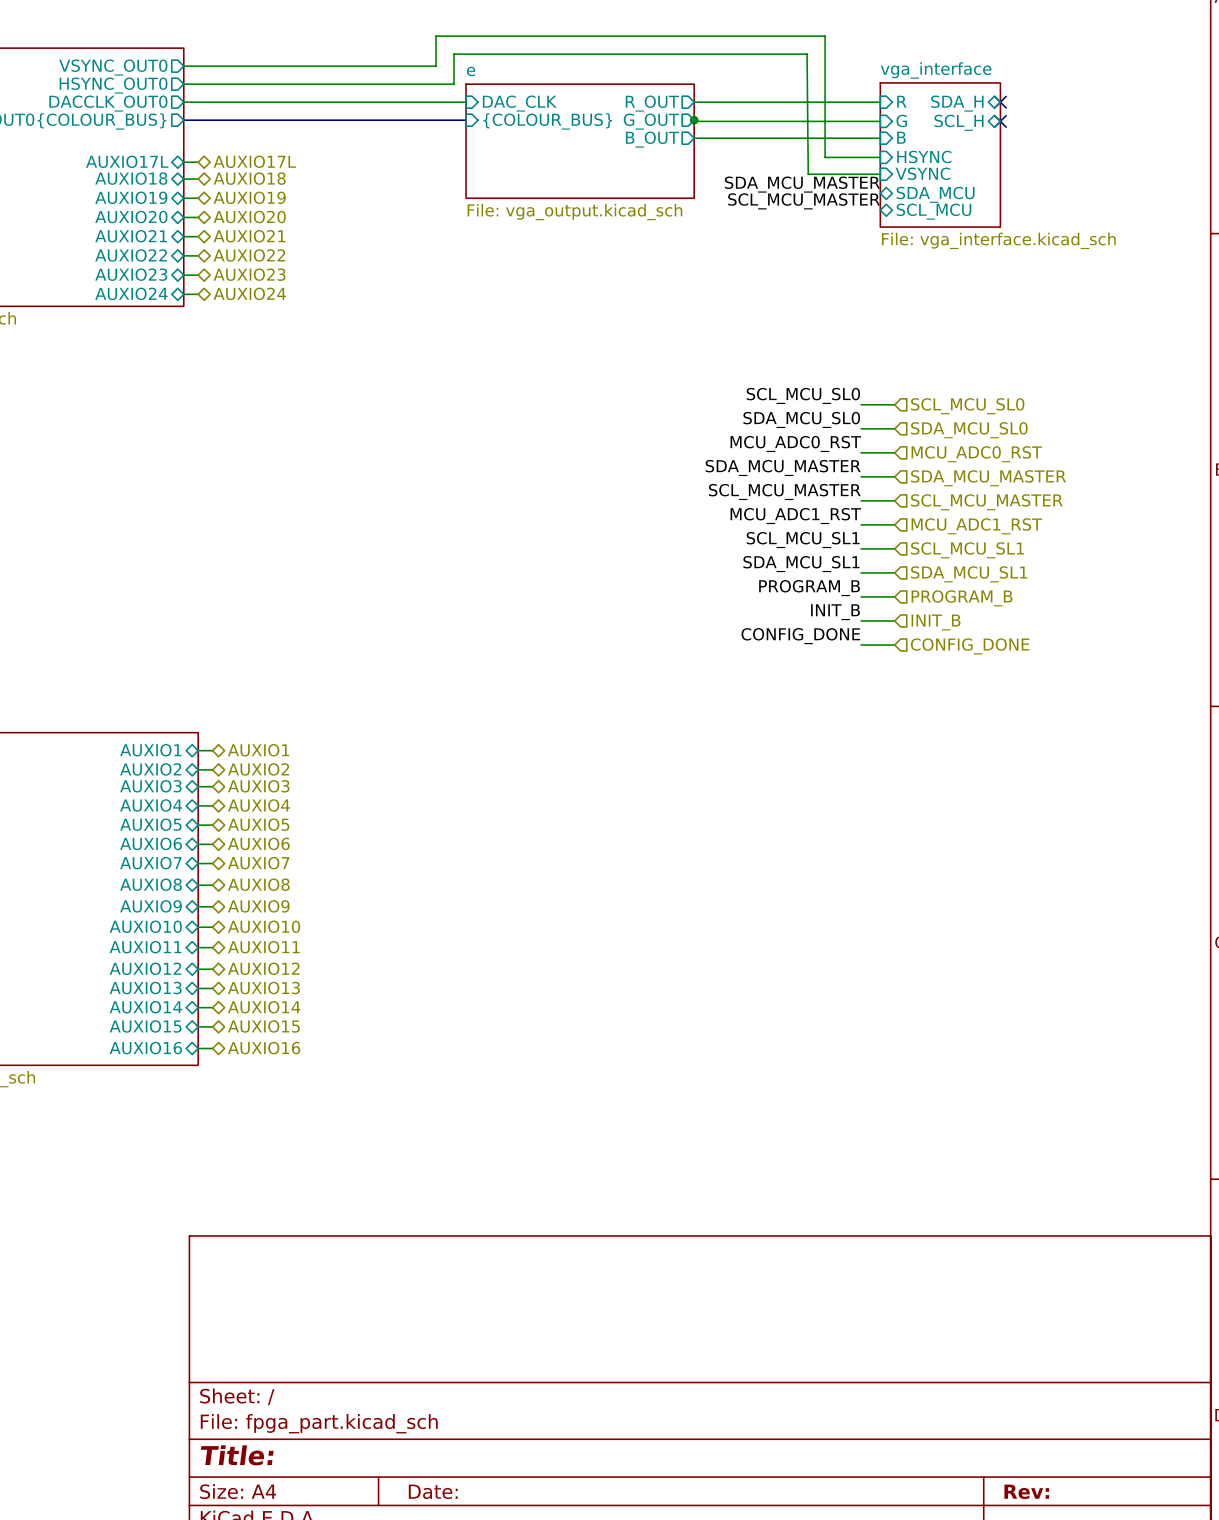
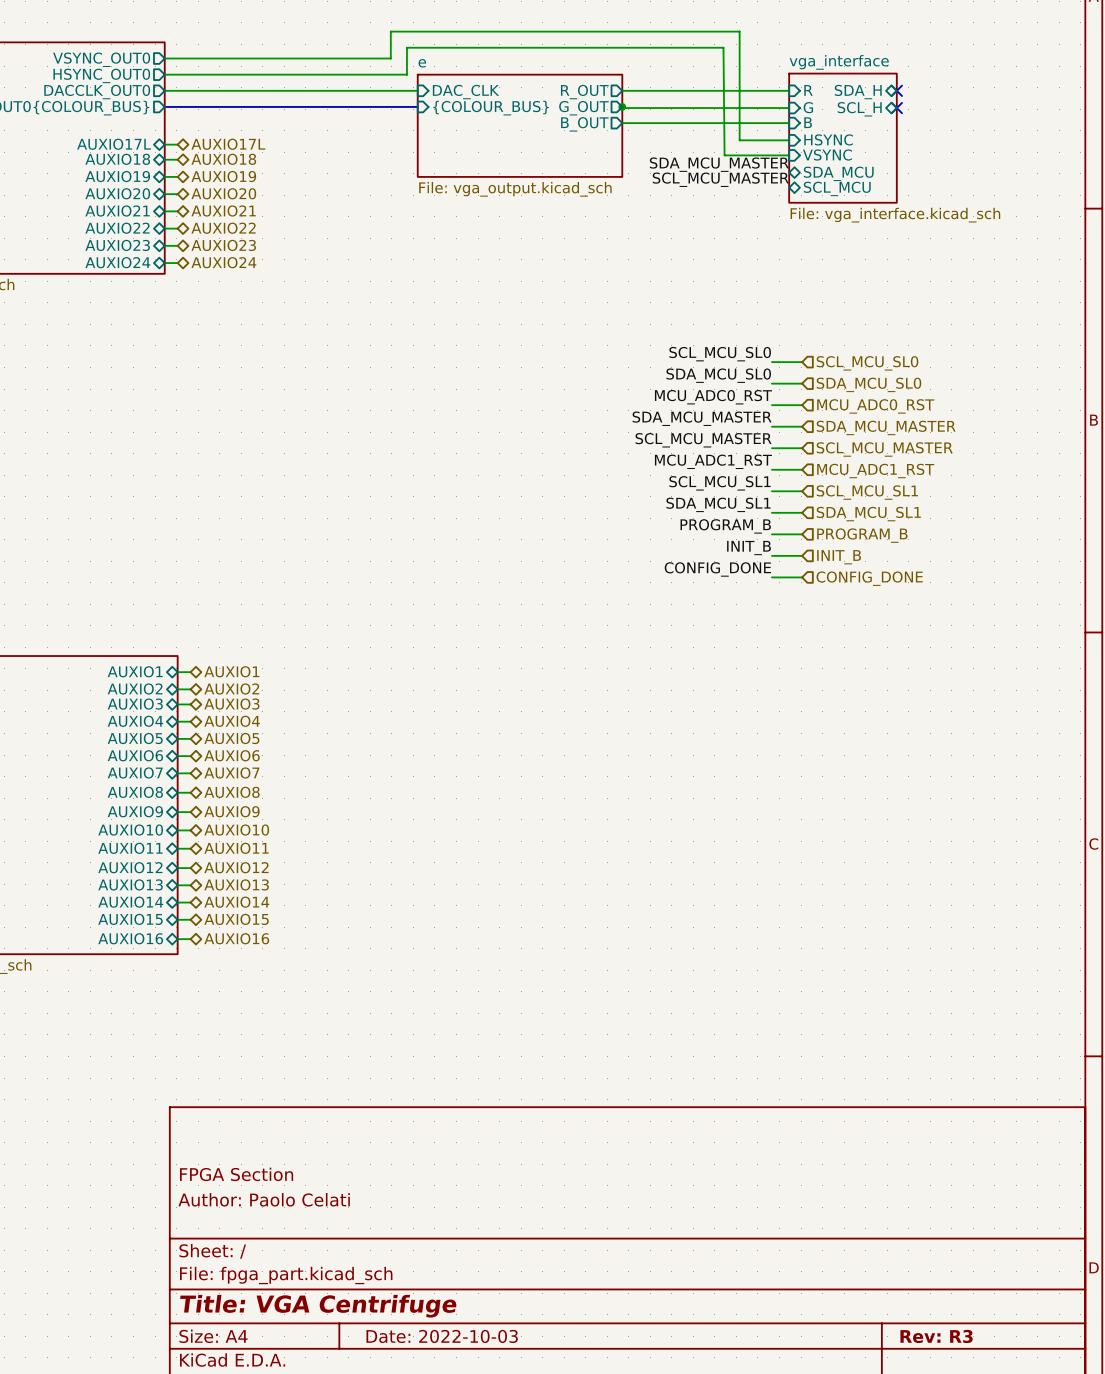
title block: none -> FPGA Section (236, 1174)
title block: none -> Author: Paolo Celati (264, 1199)
title block: Title: (237, 1455) -> Title: VGA Centrifuge (318, 1306)
title block: Date: (433, 1491) -> Date: 2022-10-03 (442, 1336)
title block: Rev: (1026, 1491) -> Rev: R3 (936, 1336)

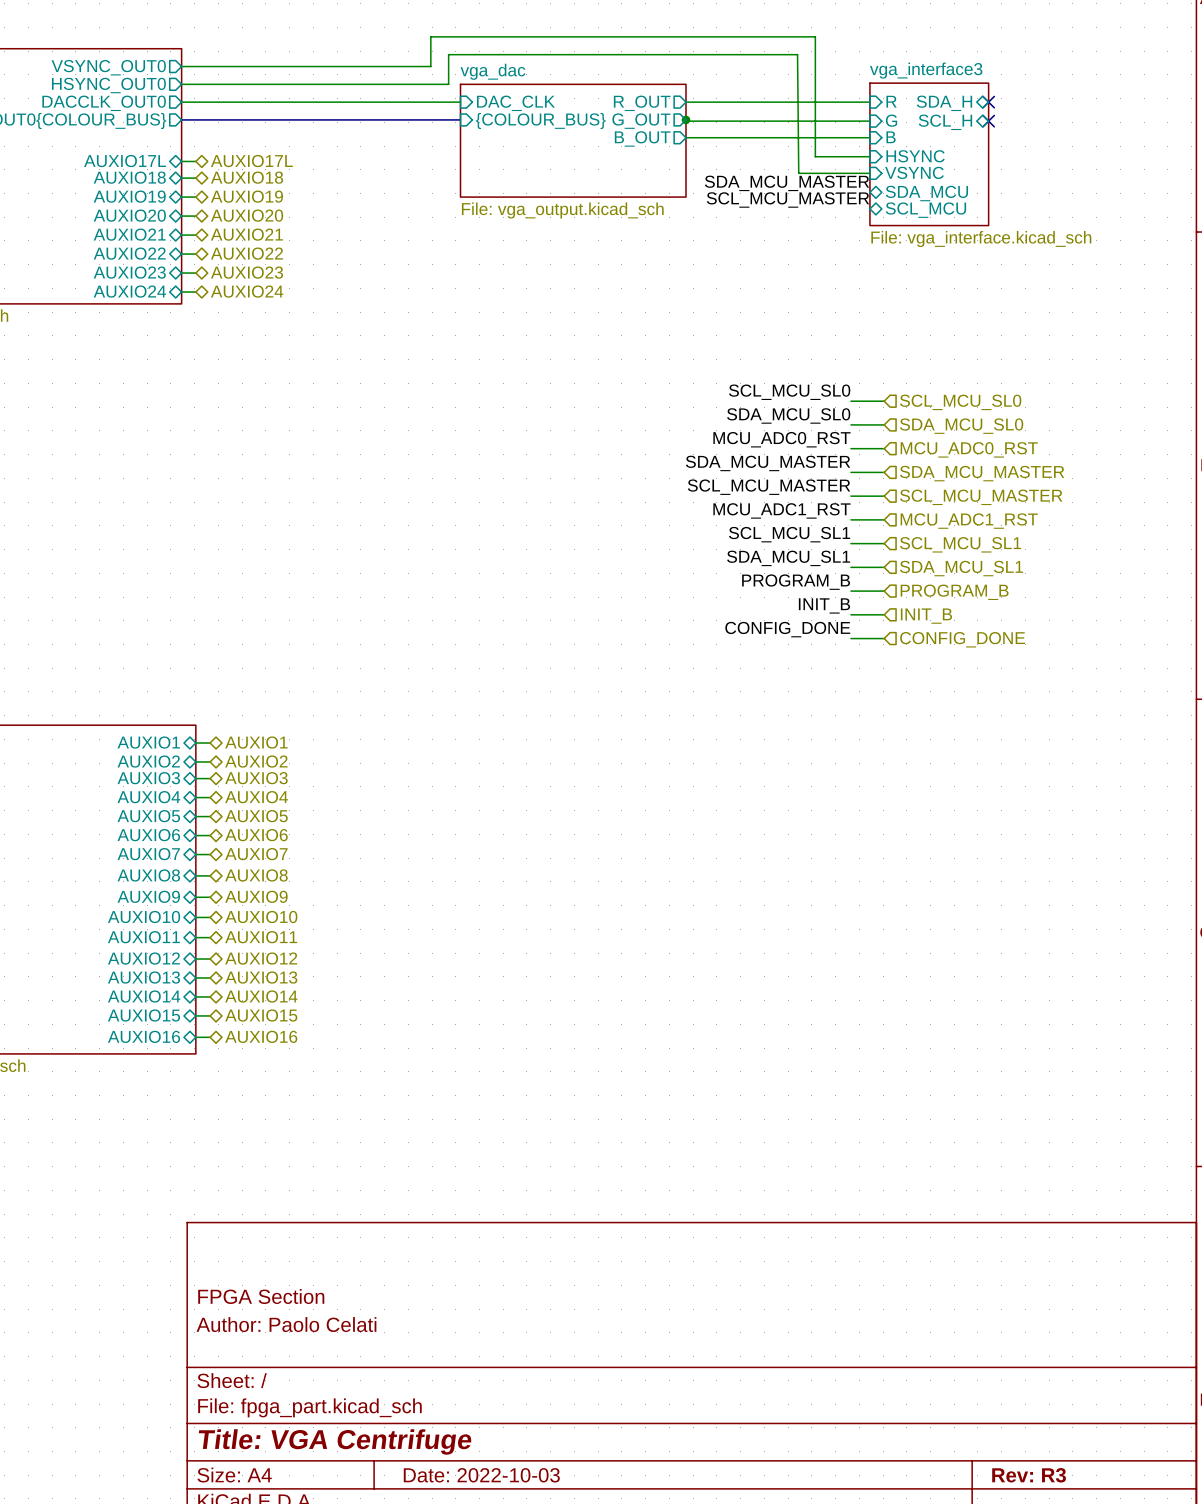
sheet vga_interface name: vga_interface (839, 62) -> vga_interface3 (926, 70)
sheet e name: e (422, 63) -> vga_dac (492, 71)

